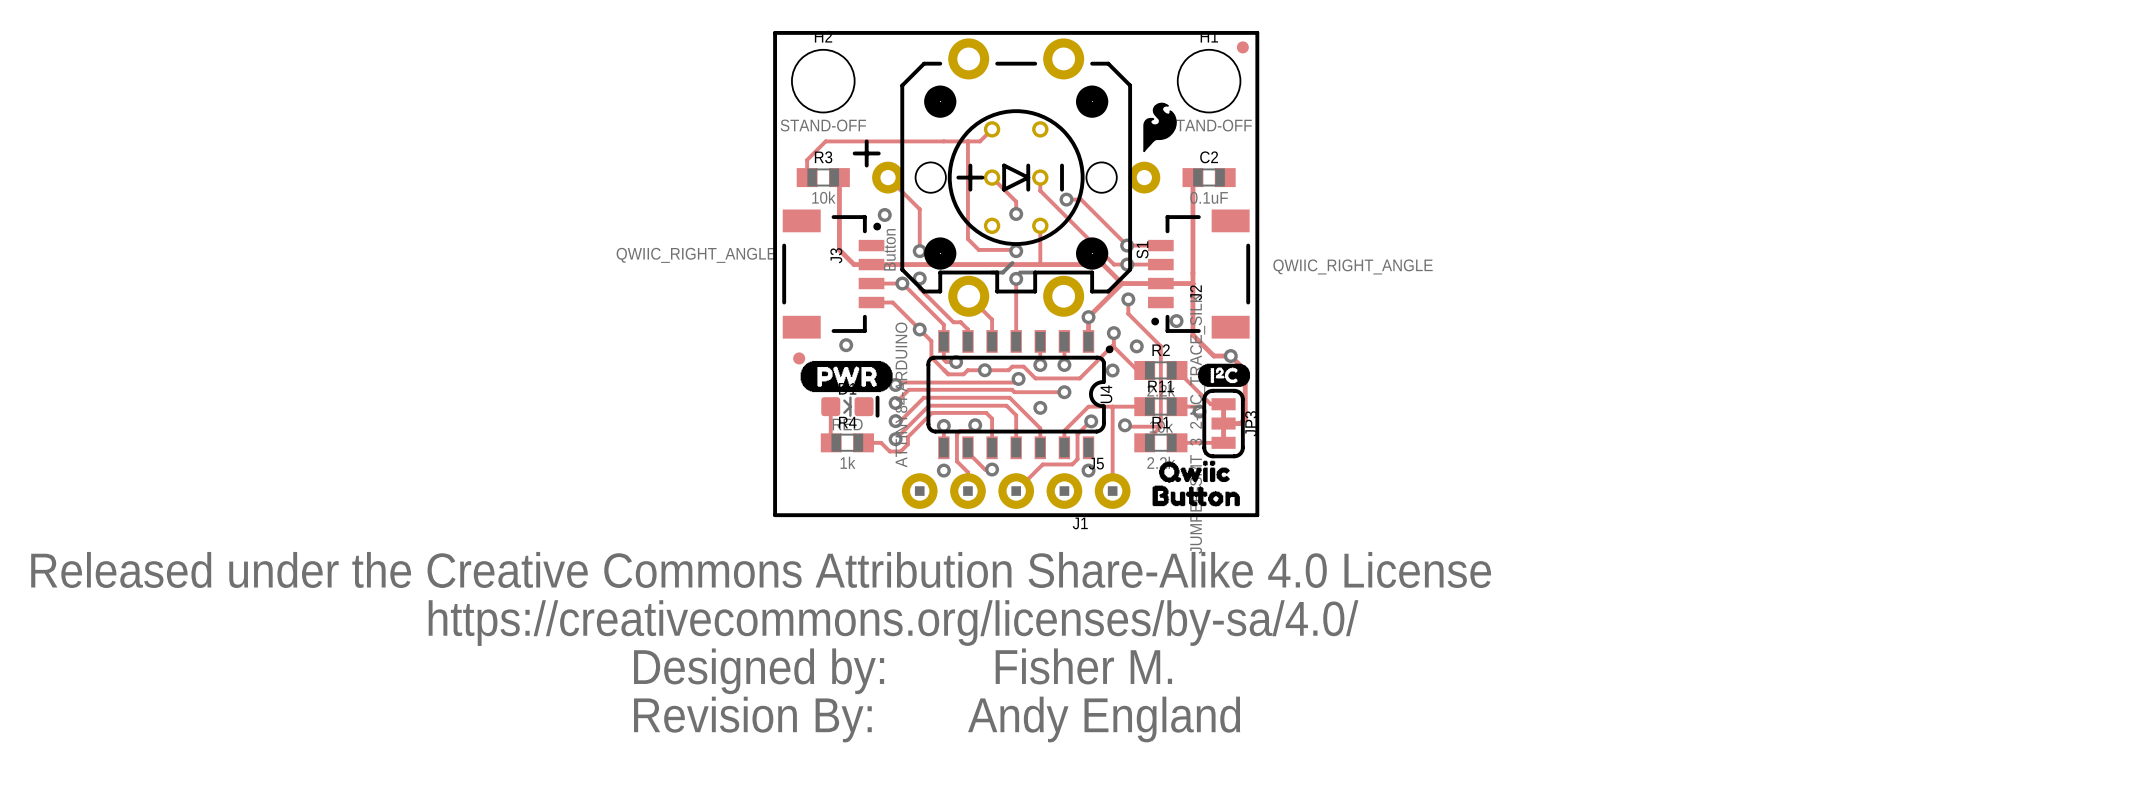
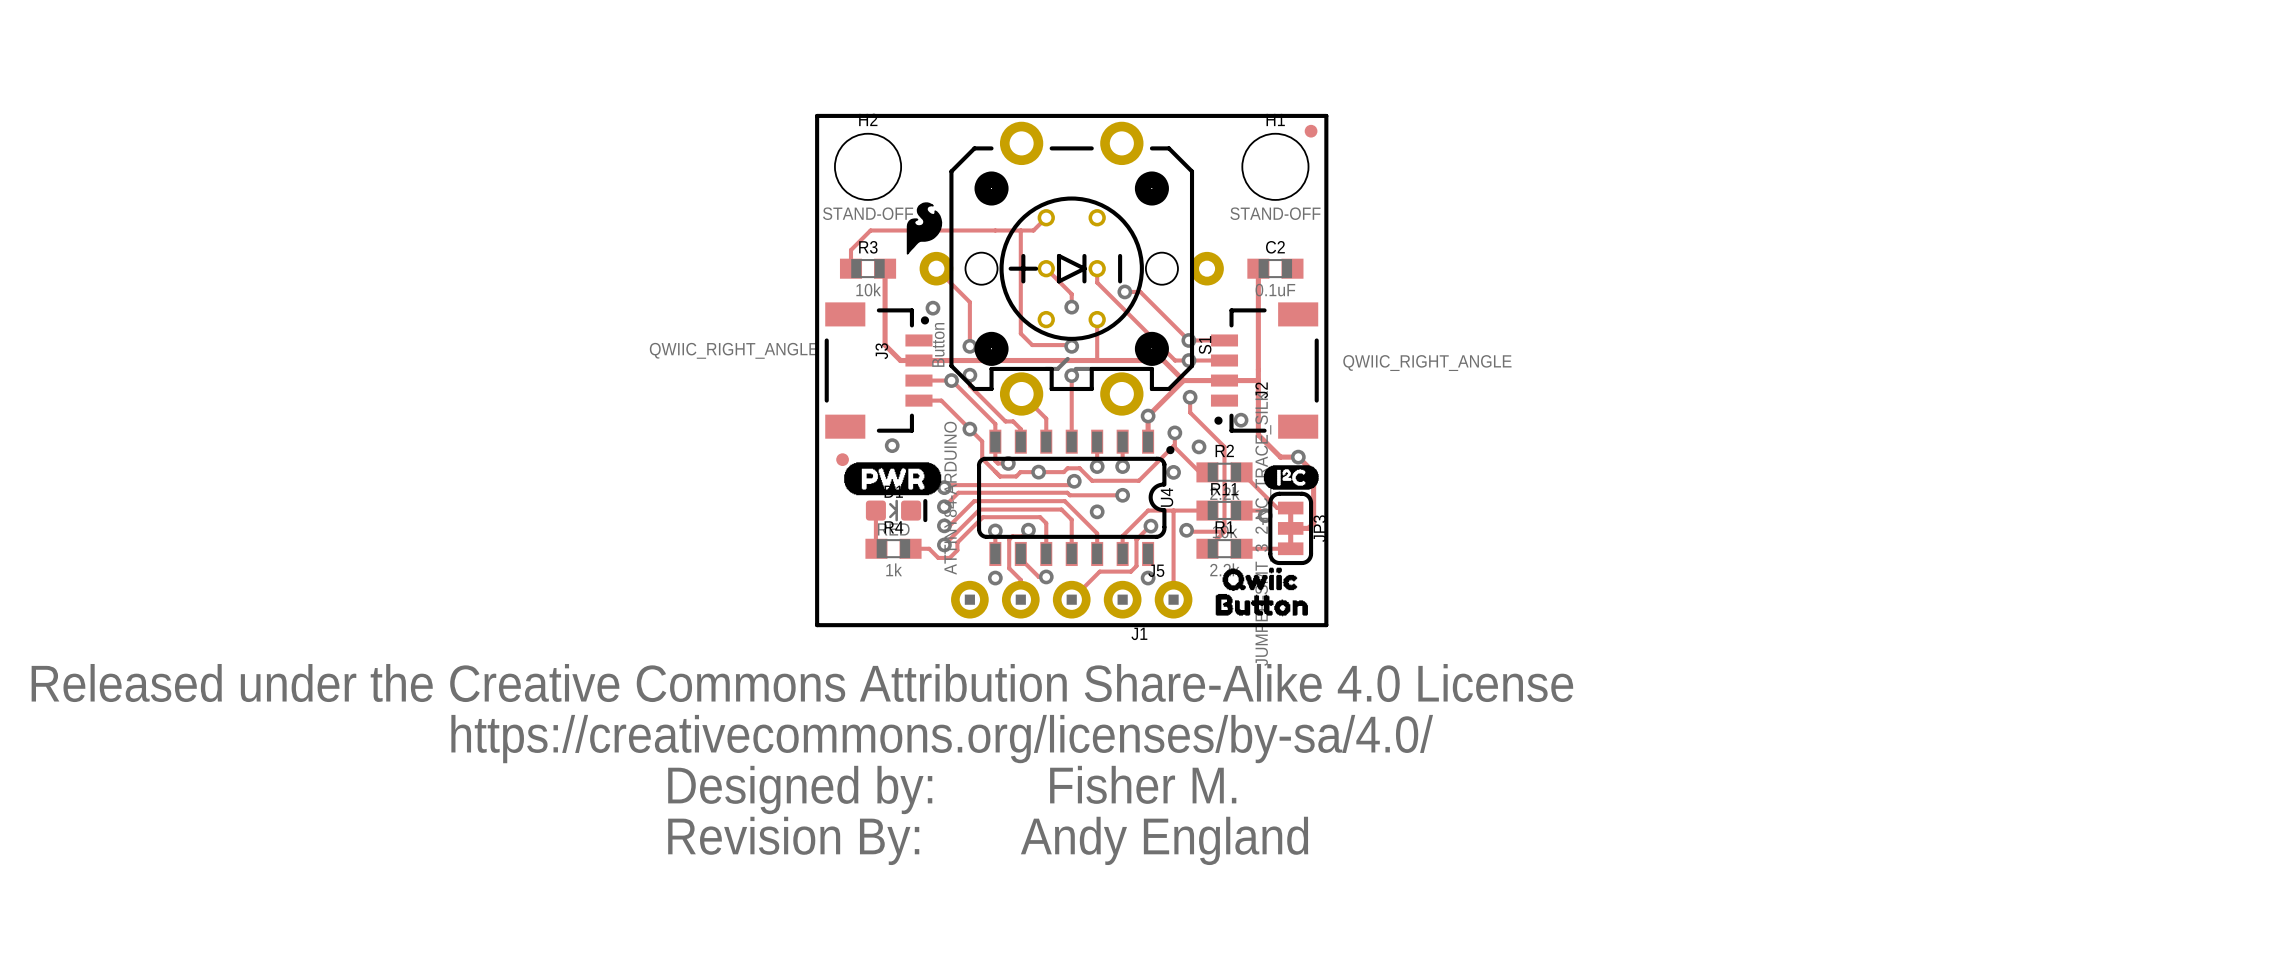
S1 footprint: [852, 38, 1161, 317] -> [919, 121, 1224, 416]
drawing position: (1160, 127) -> (924, 228)

